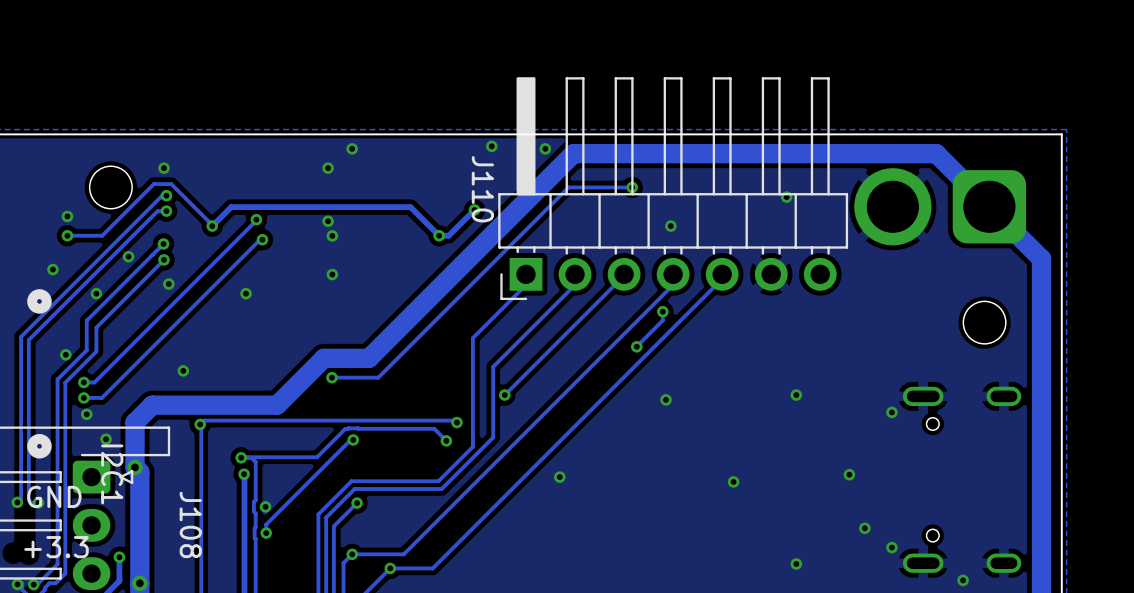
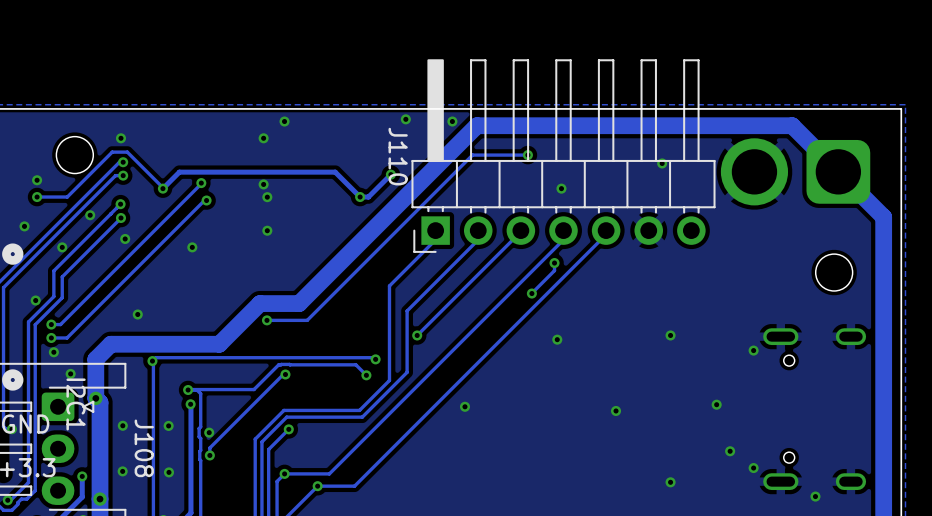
via: none -> (122, 425)
via: none -> (168, 425)
via: none -> (122, 471)
via: none -> (168, 472)

